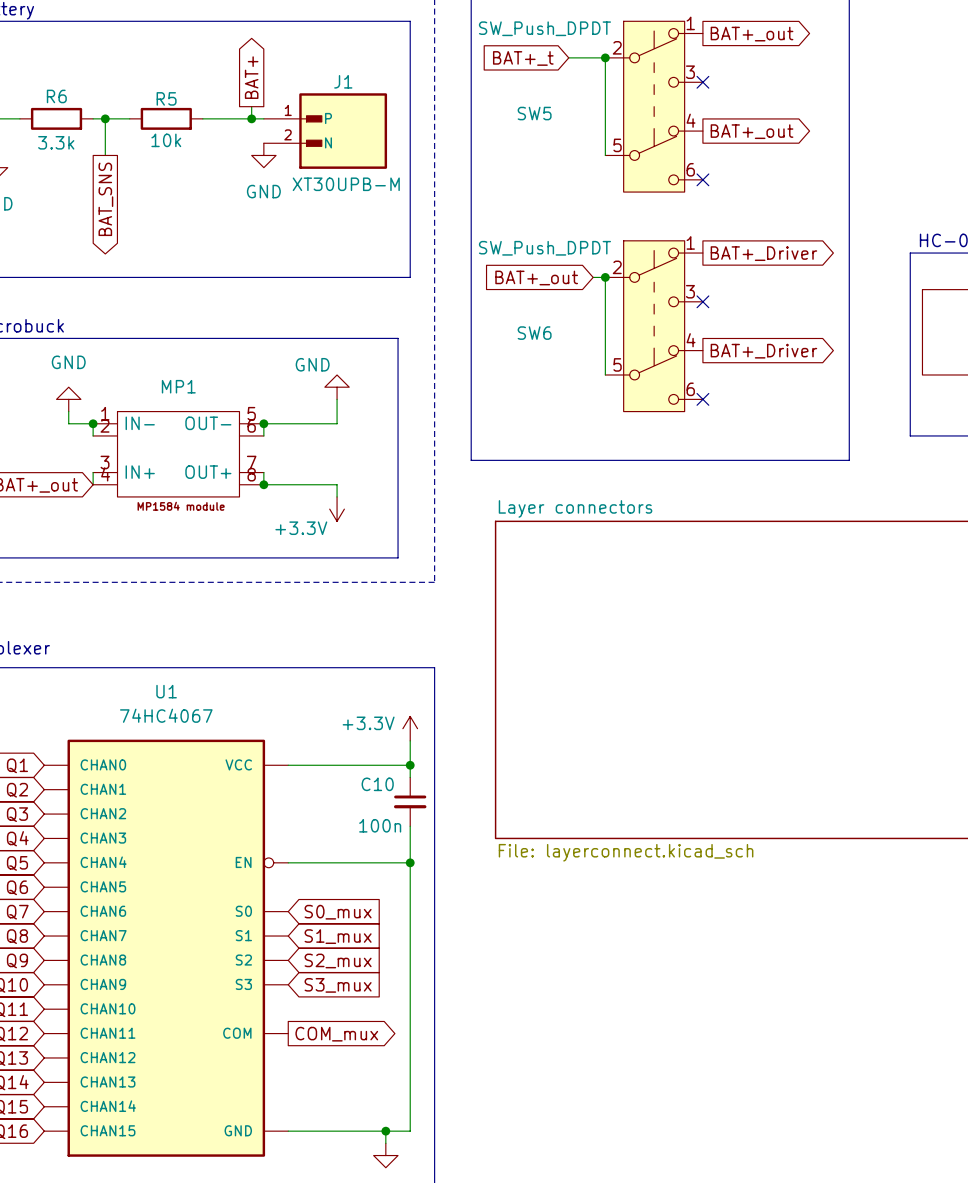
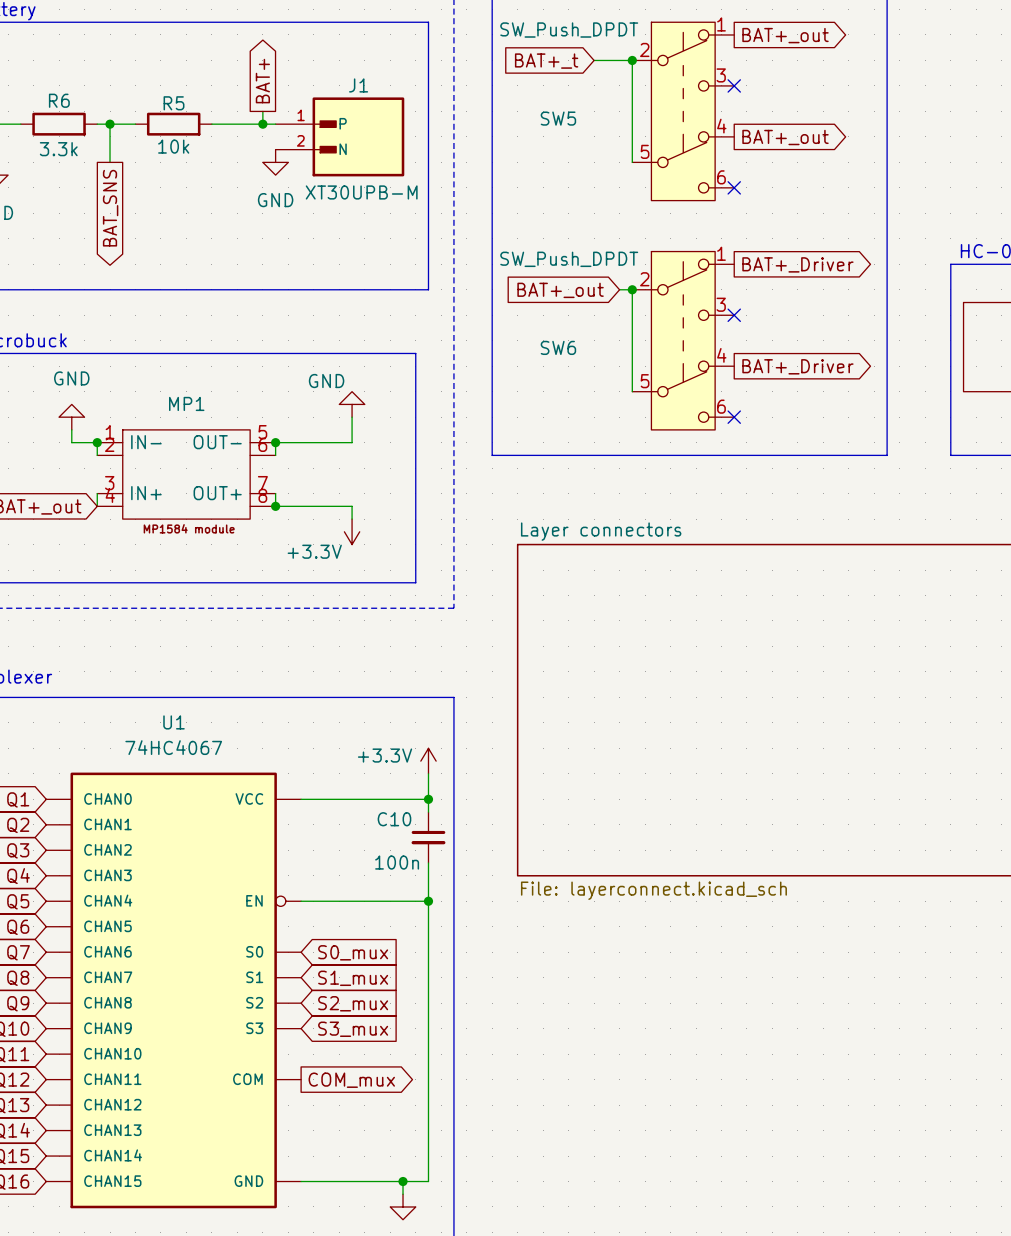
line: (471, 435) (471, 460) (849, 460) (849, 435) -> (492, 455) (887, 455)

